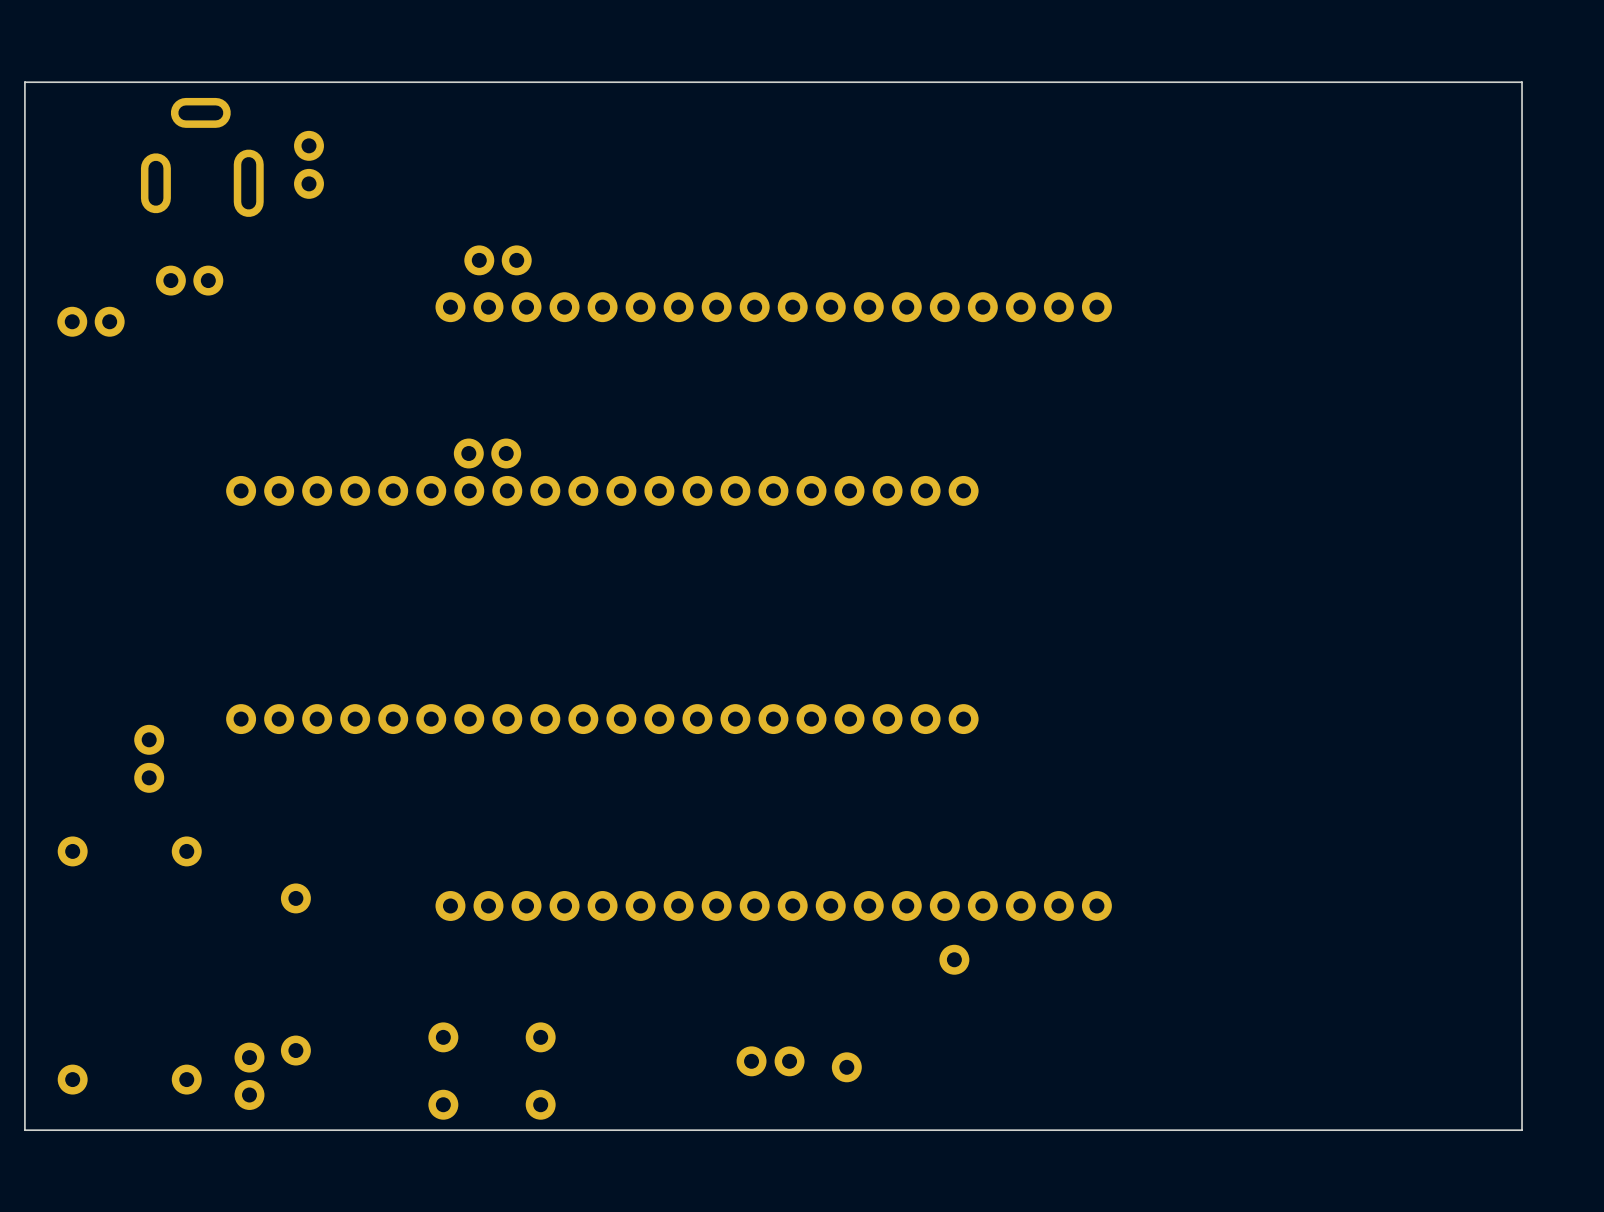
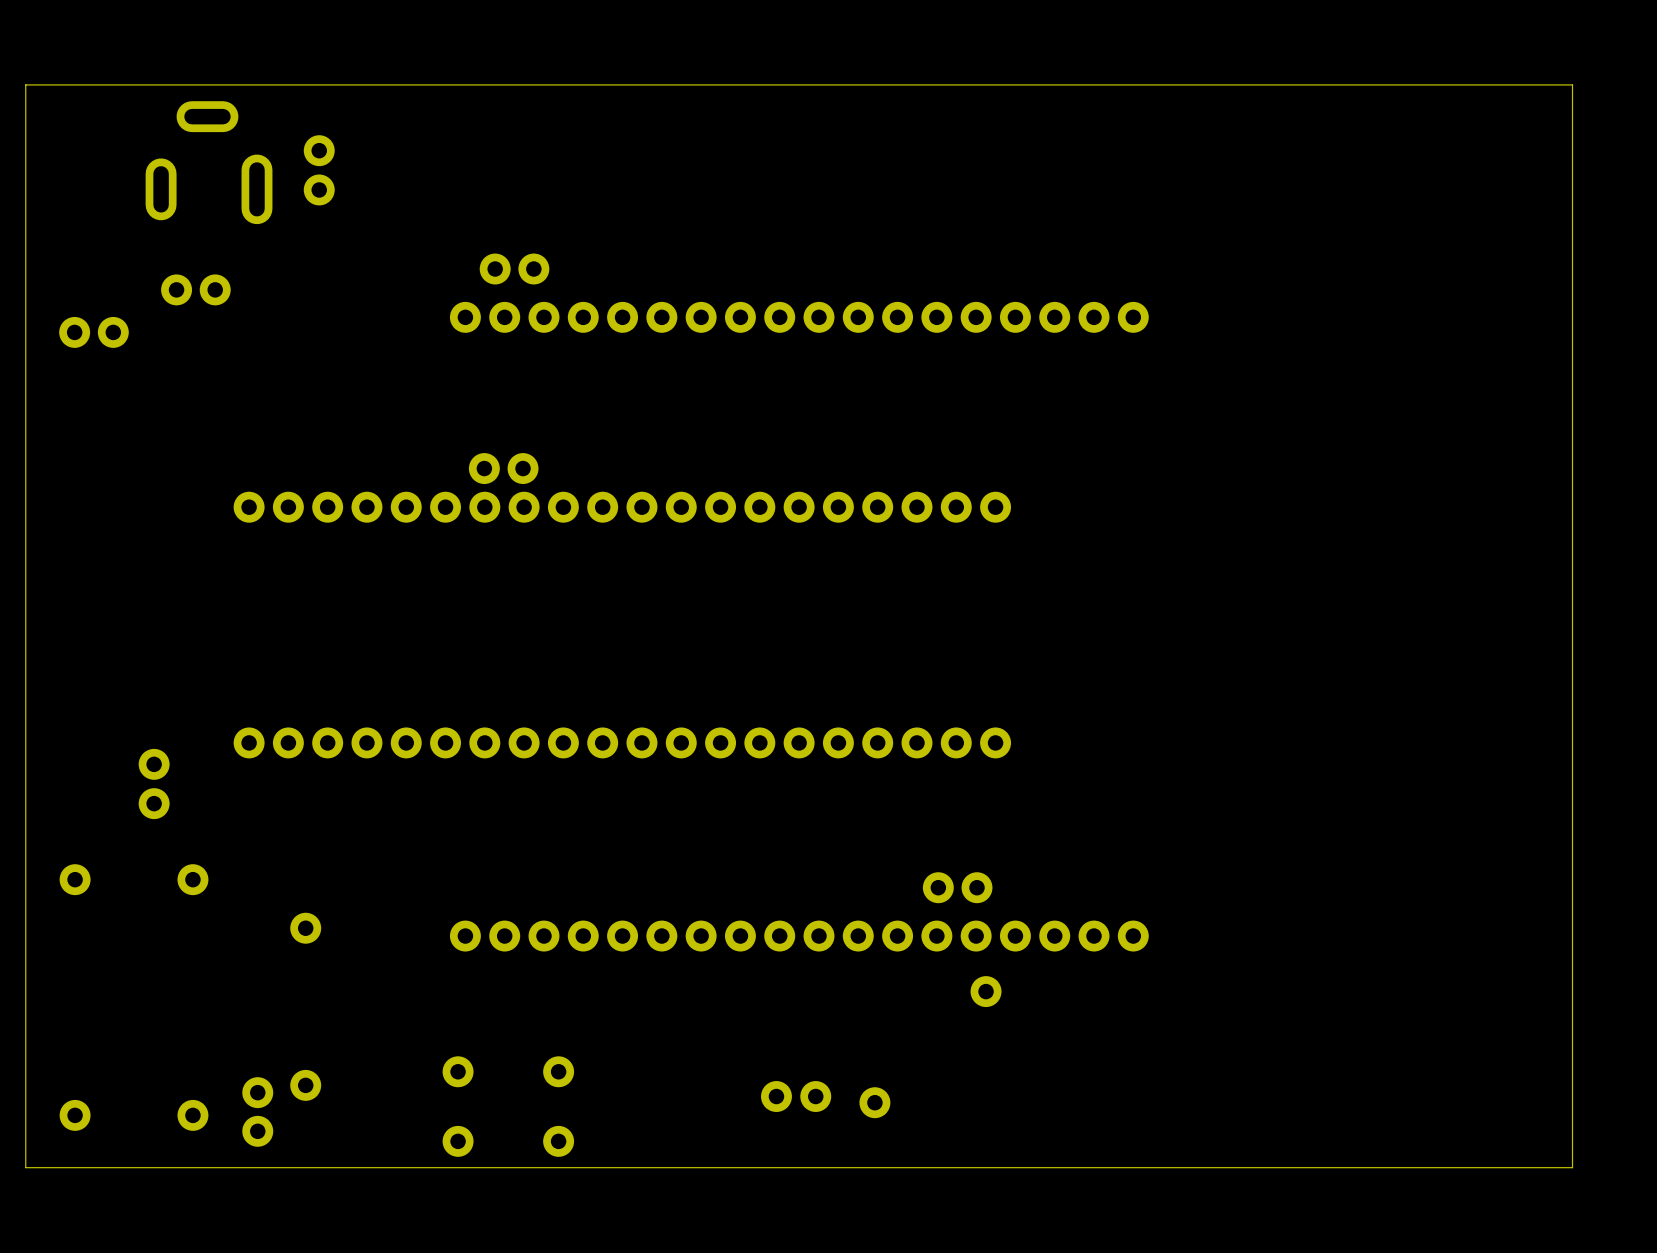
part: none -> (957, 887)

